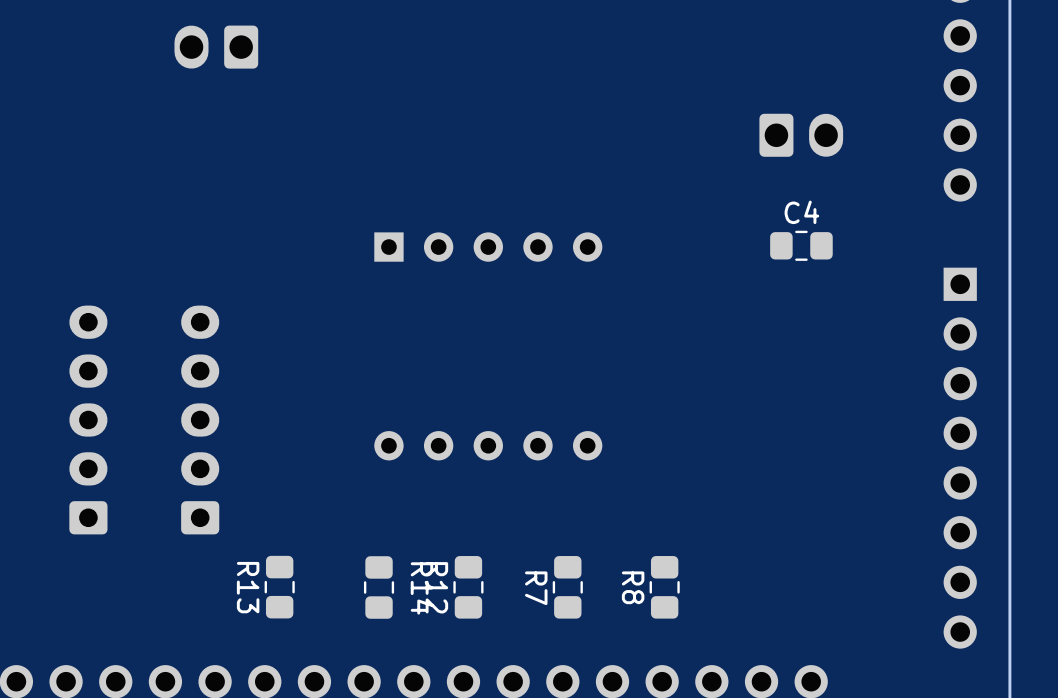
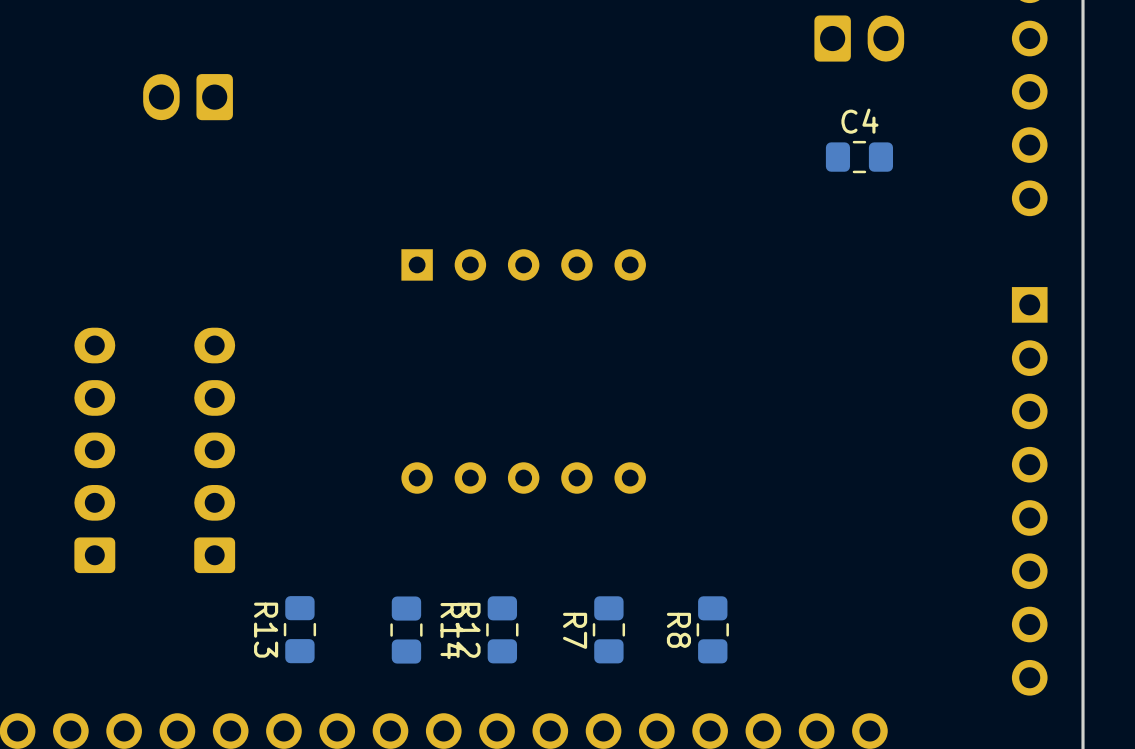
part position: (216, 47) -> (188, 97)
part position: (801, 135) -> (859, 38)
C4 position: (801, 245) -> (859, 157)

